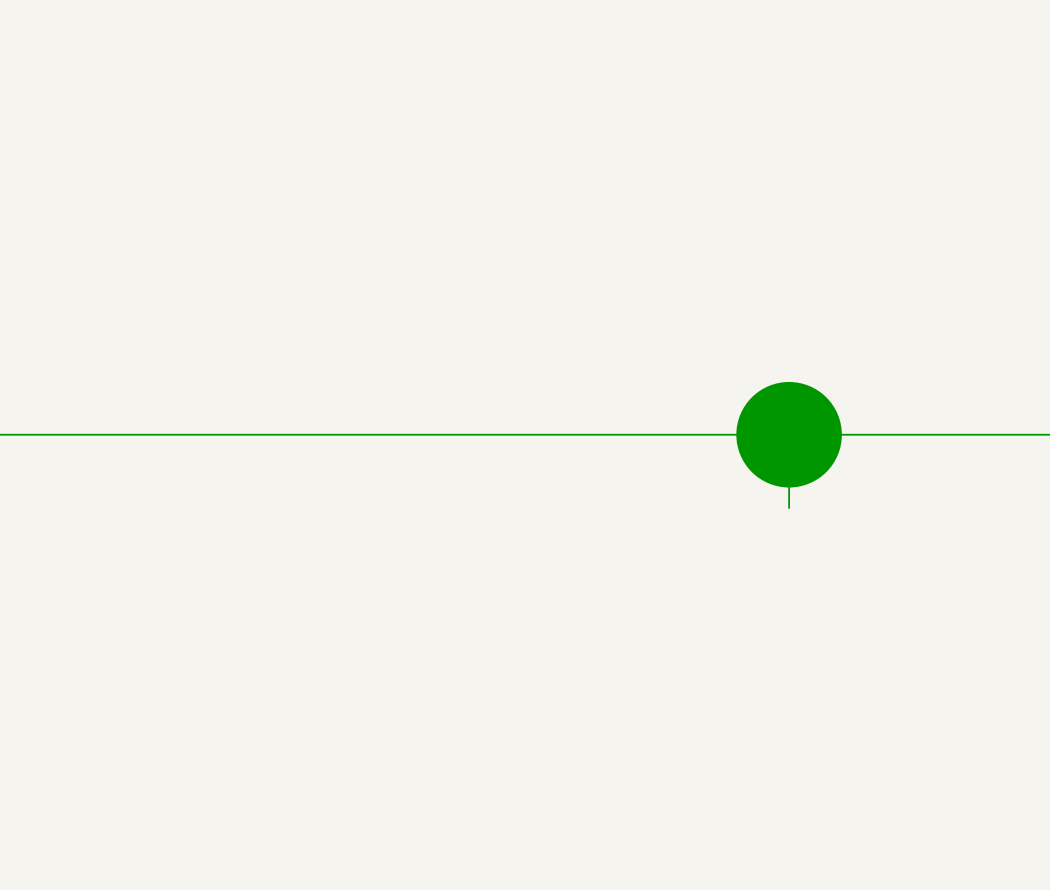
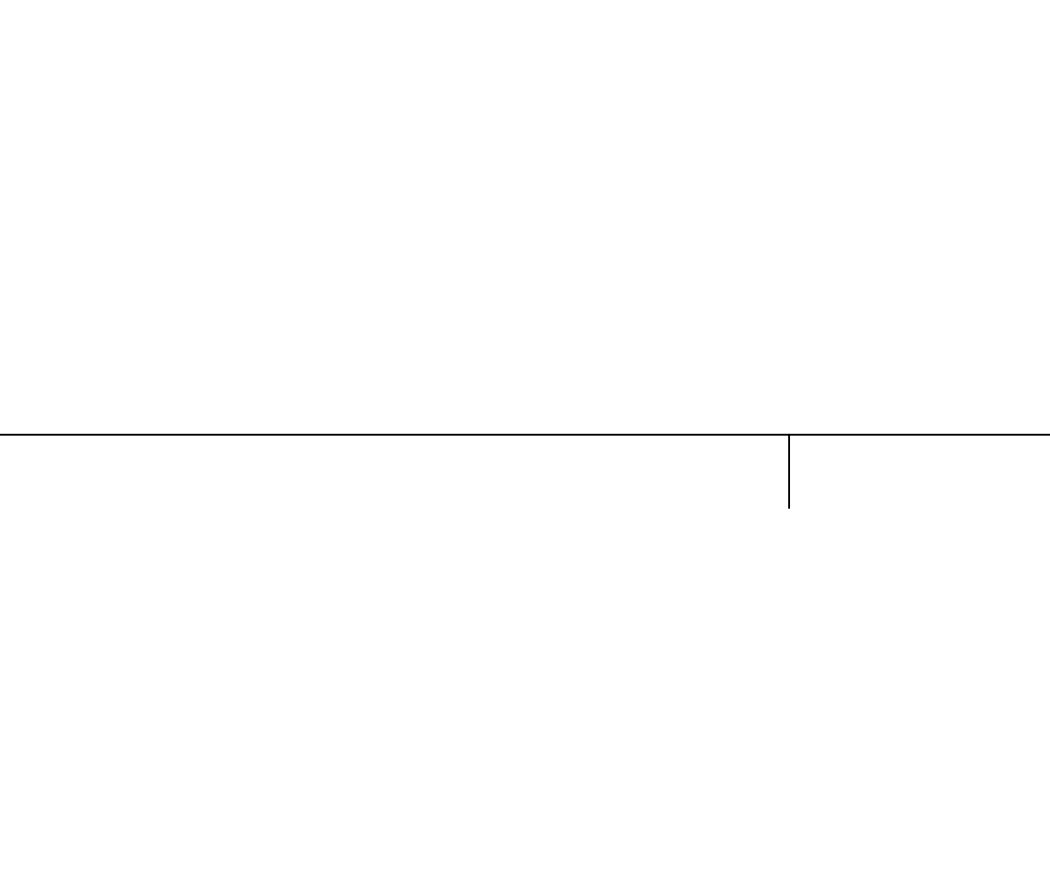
junction: (789, 434) -> none

